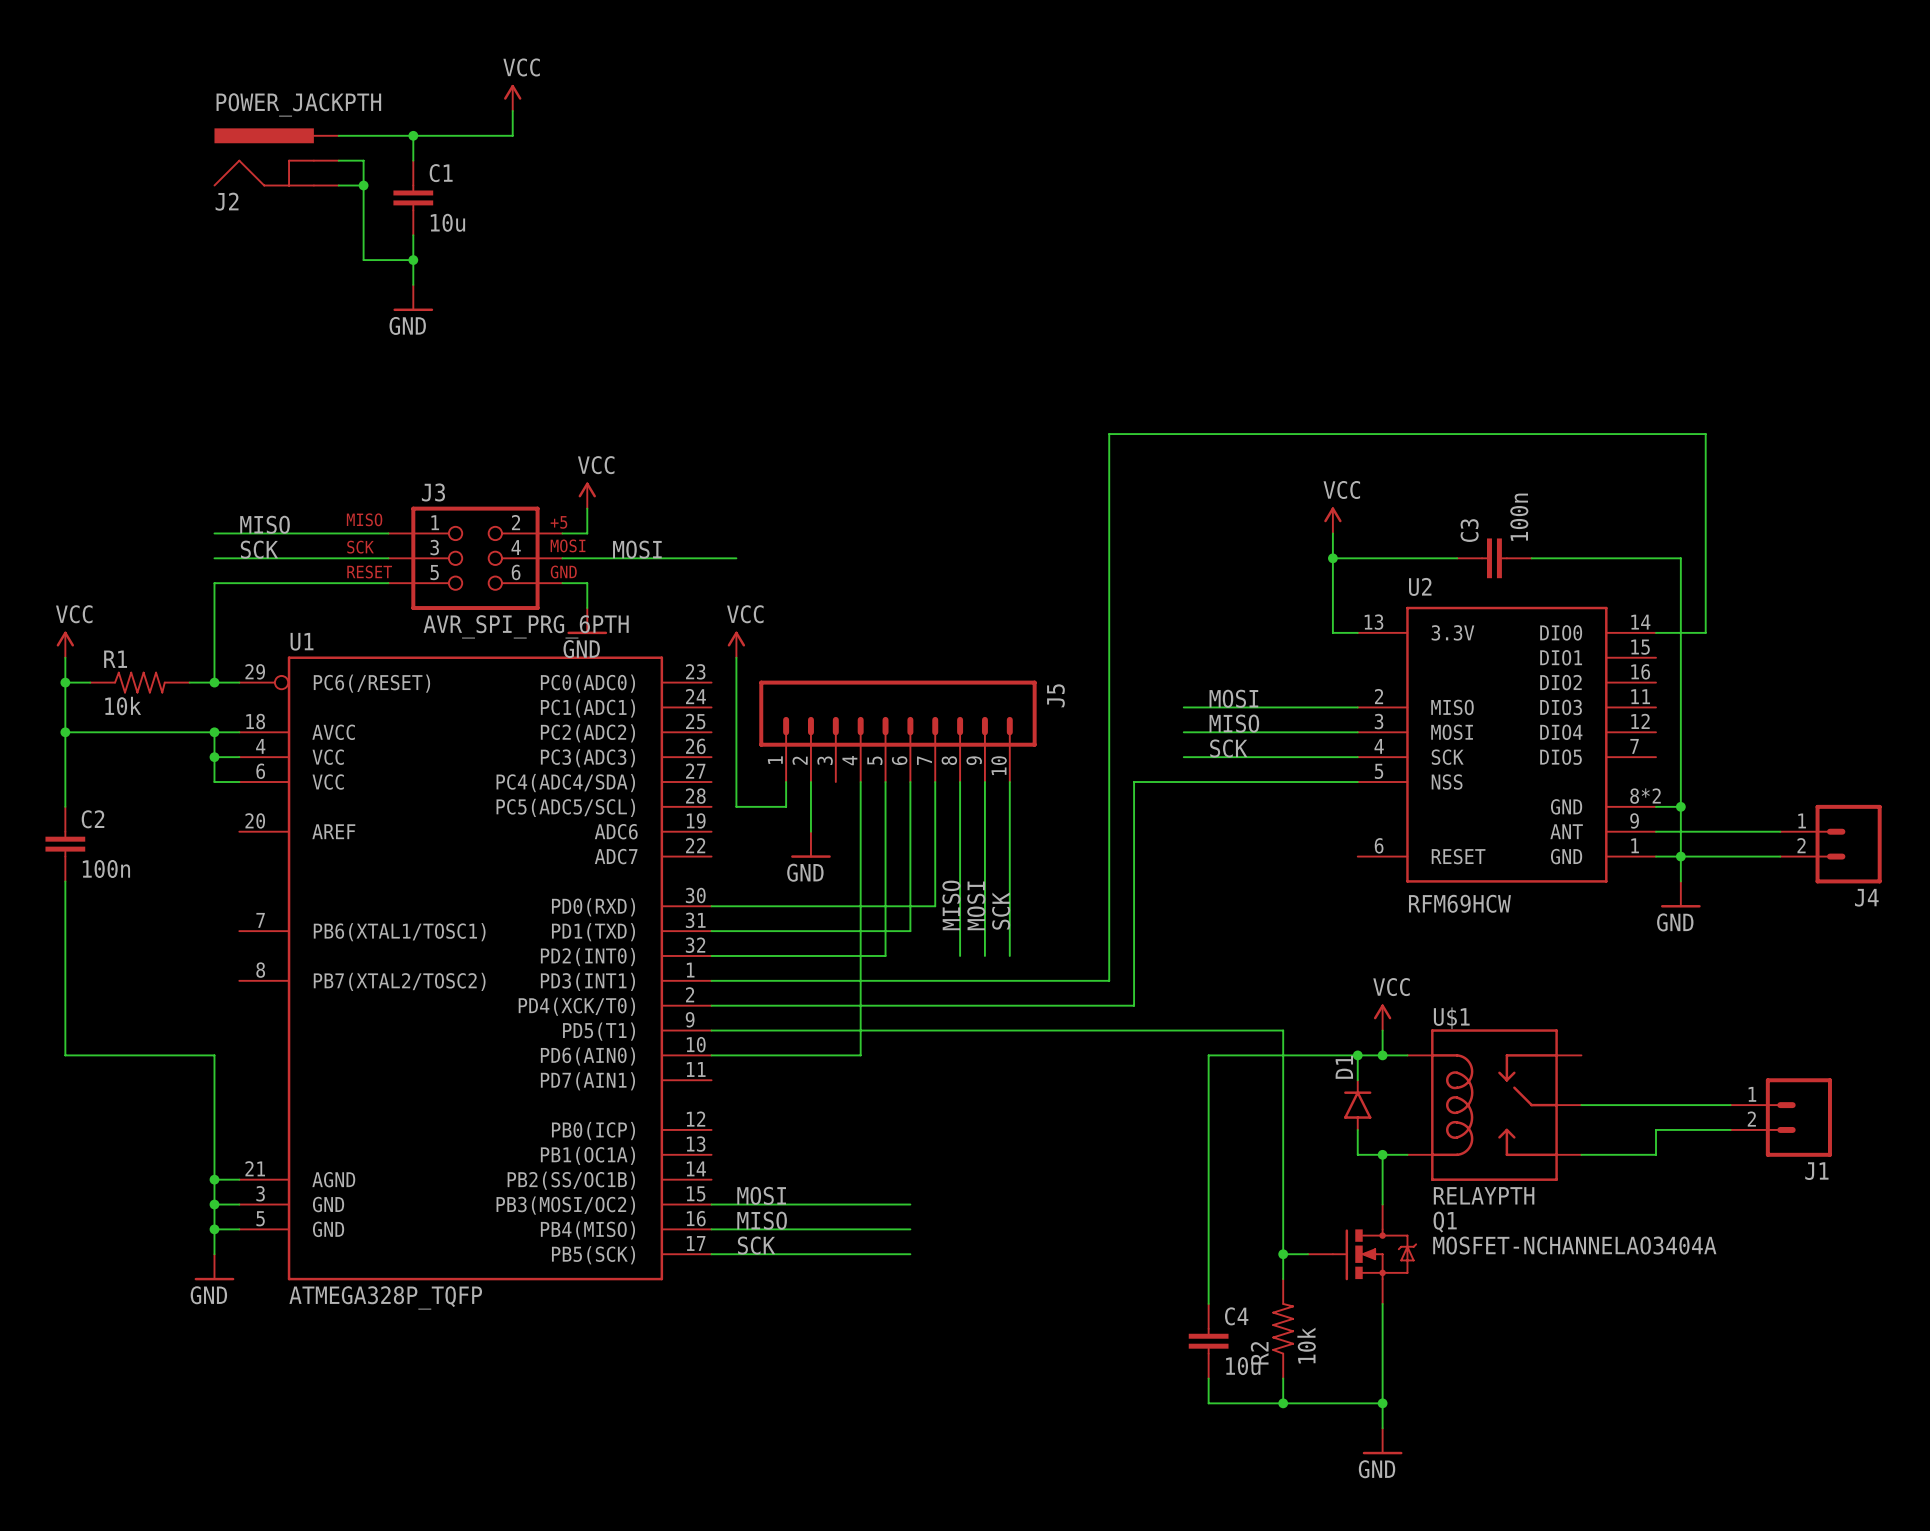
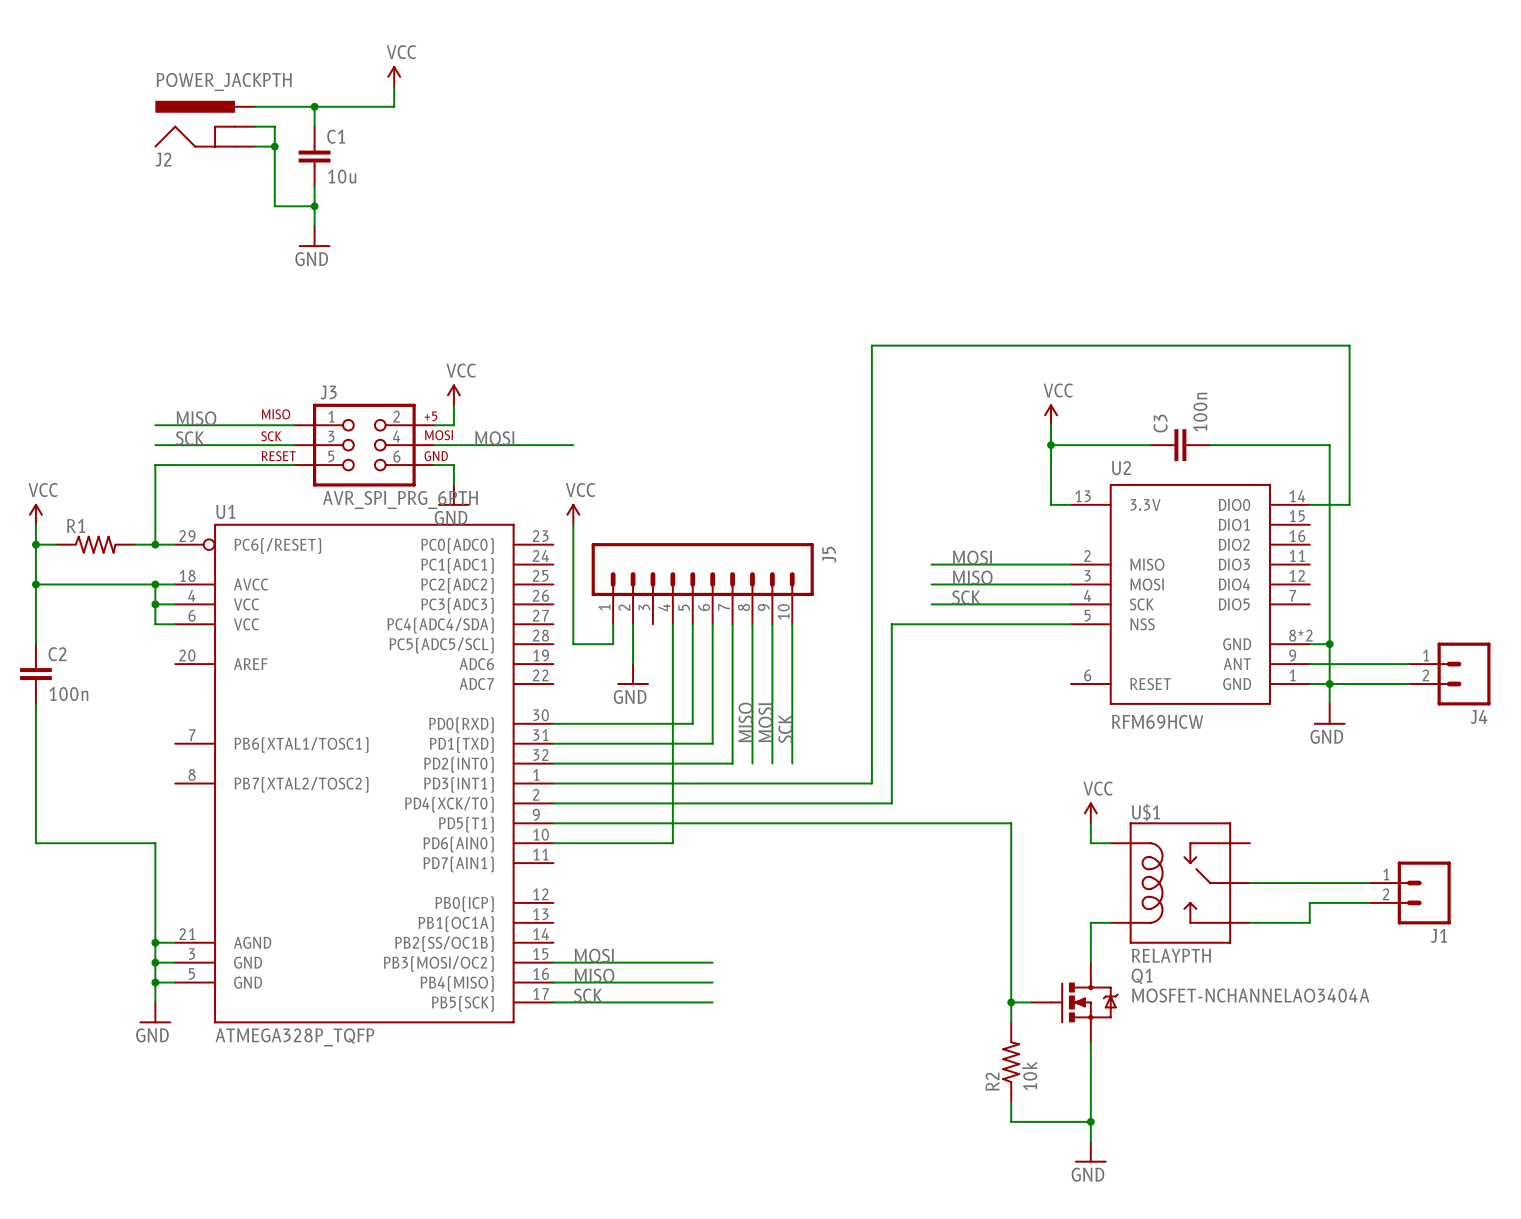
R1 value: 10k (123, 706) -> none
wire: (935, 906) (885, 906) (885, 955) -> (732, 723) (732, 763) (692, 763)
wire: (1357, 1055) (1357, 1080) -> none
junction: (1357, 1055) -> none
wire: (1382, 1055) (1208, 1055) (1208, 1303) -> none
junction: (1382, 1055) -> none
D1: (1357, 1105) -> none
wire: (1357, 1129) (1357, 1154) (1382, 1154) -> none
junction: (1382, 1154) -> none
C4: 10u (1208, 1341) -> none
wire: (1208, 1378) (1208, 1403) (1283, 1403) -> none
junction: (1283, 1403) -> none

